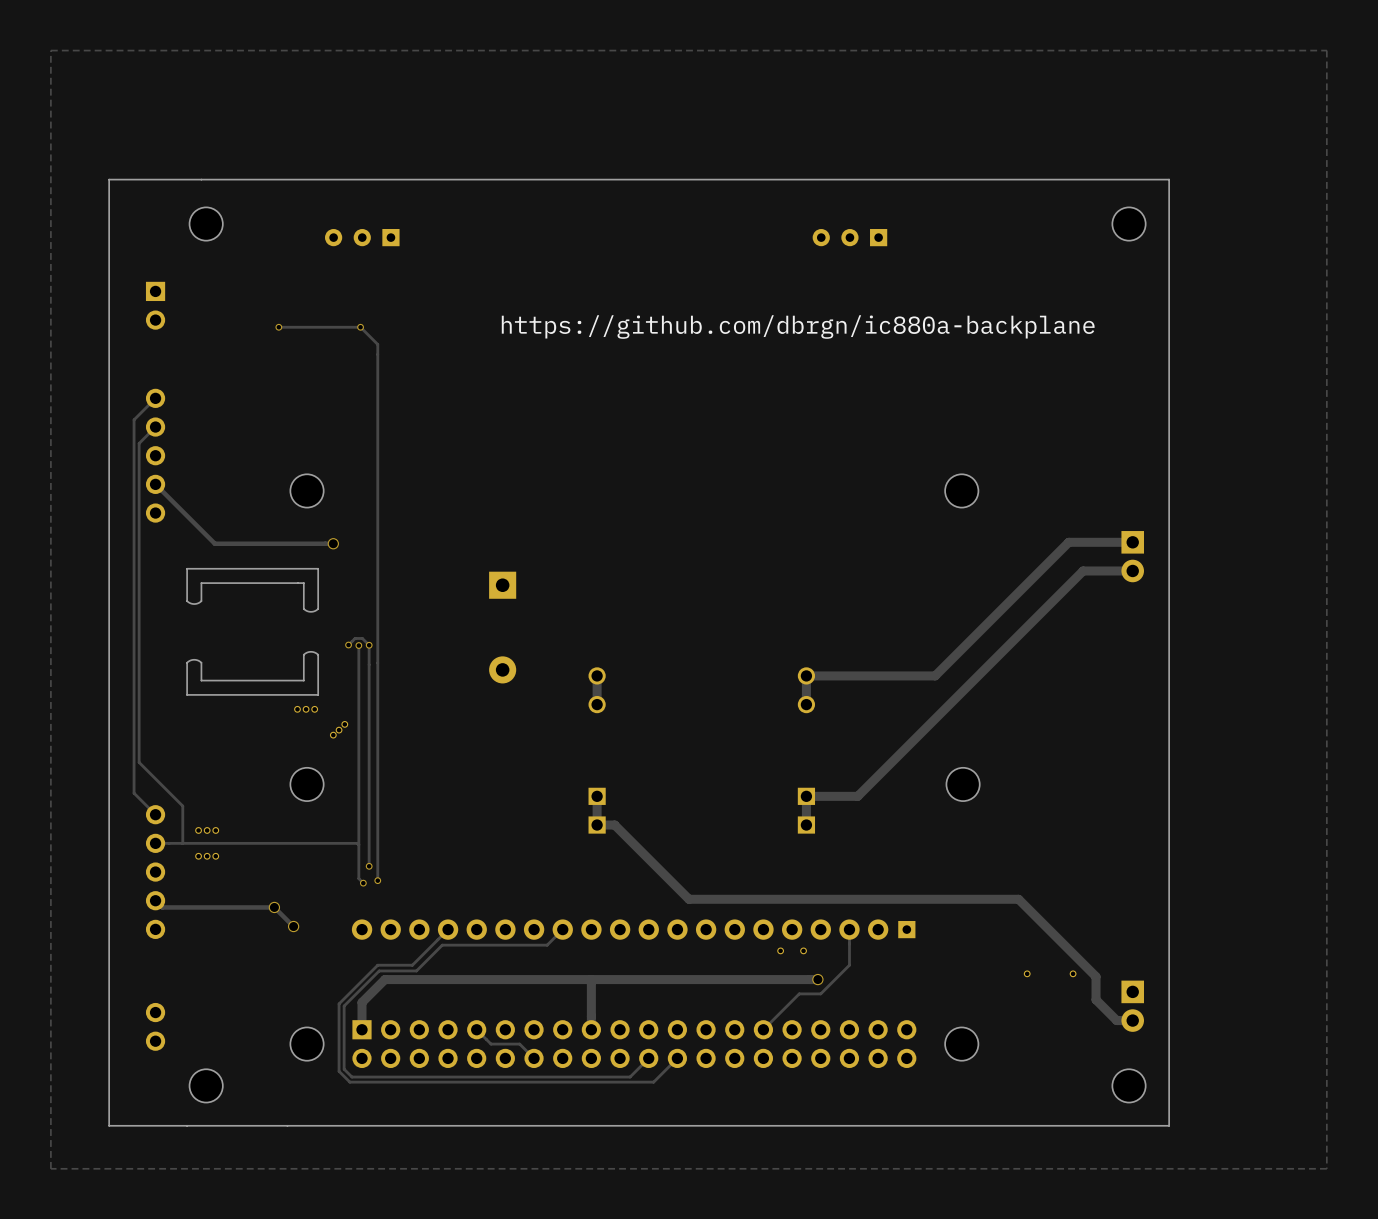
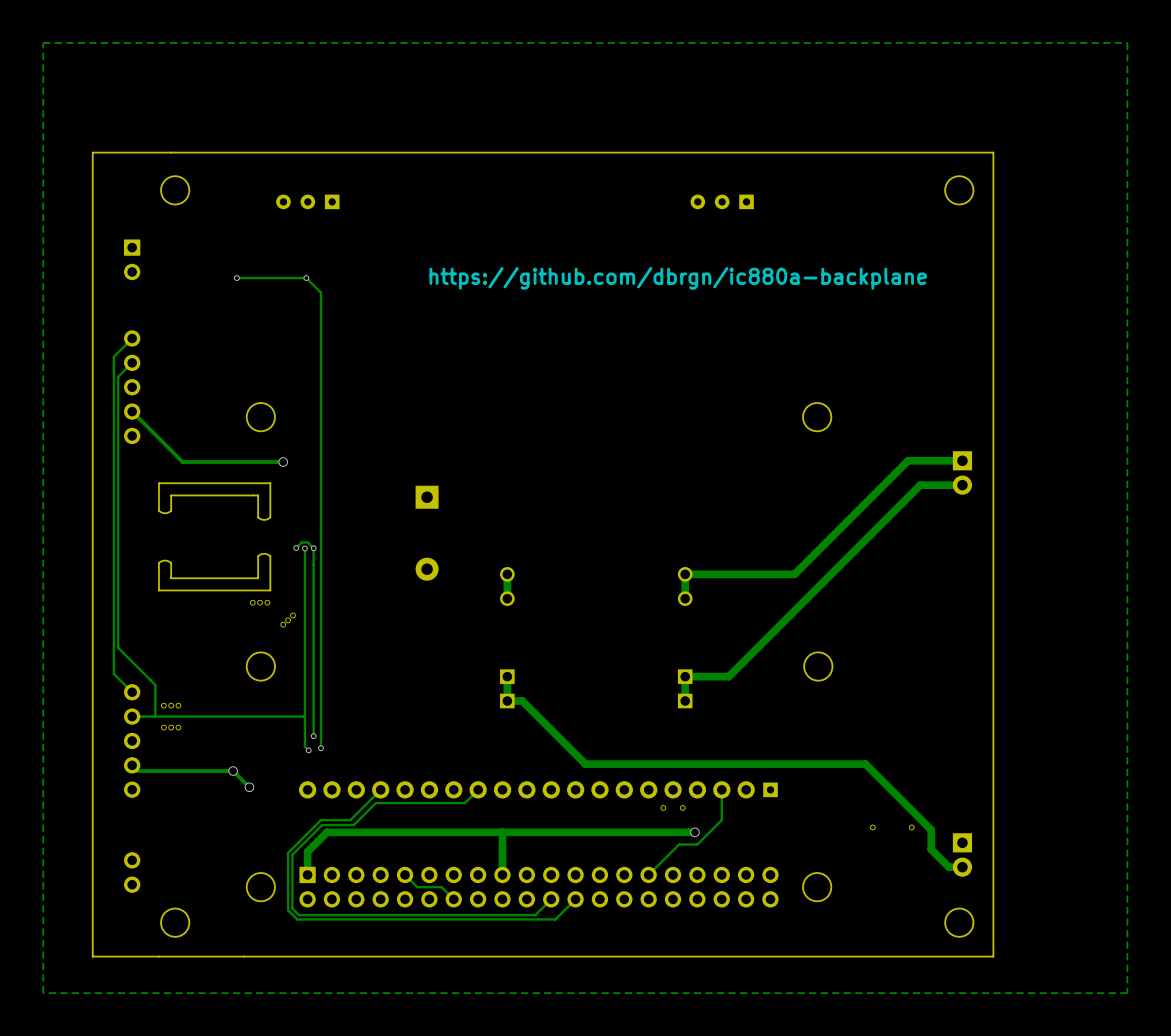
part: none -> (163, 705)
part: (198, 830) -> none
part: none -> (171, 705)
part: (207, 830) -> none
part: none -> (178, 705)
part: (215, 830) -> none
part: none -> (163, 727)
part: (198, 856) -> none
part: none -> (171, 727)
part: (207, 856) -> none
part: none -> (178, 727)
part: (215, 856) -> none

